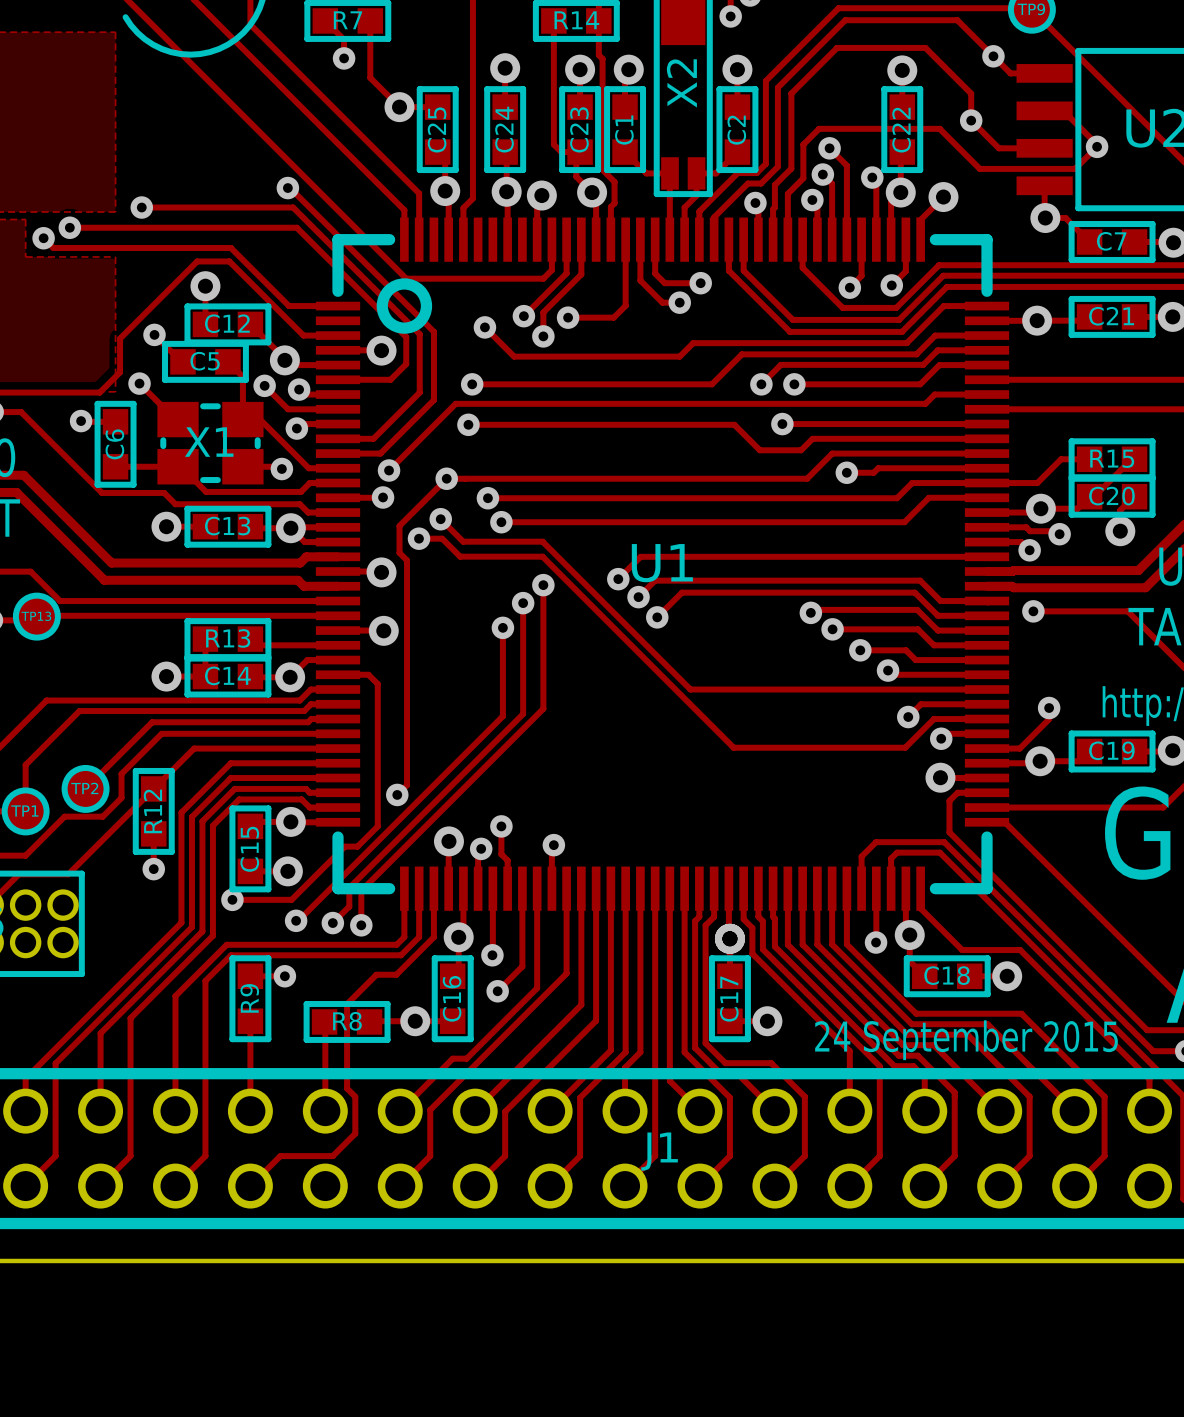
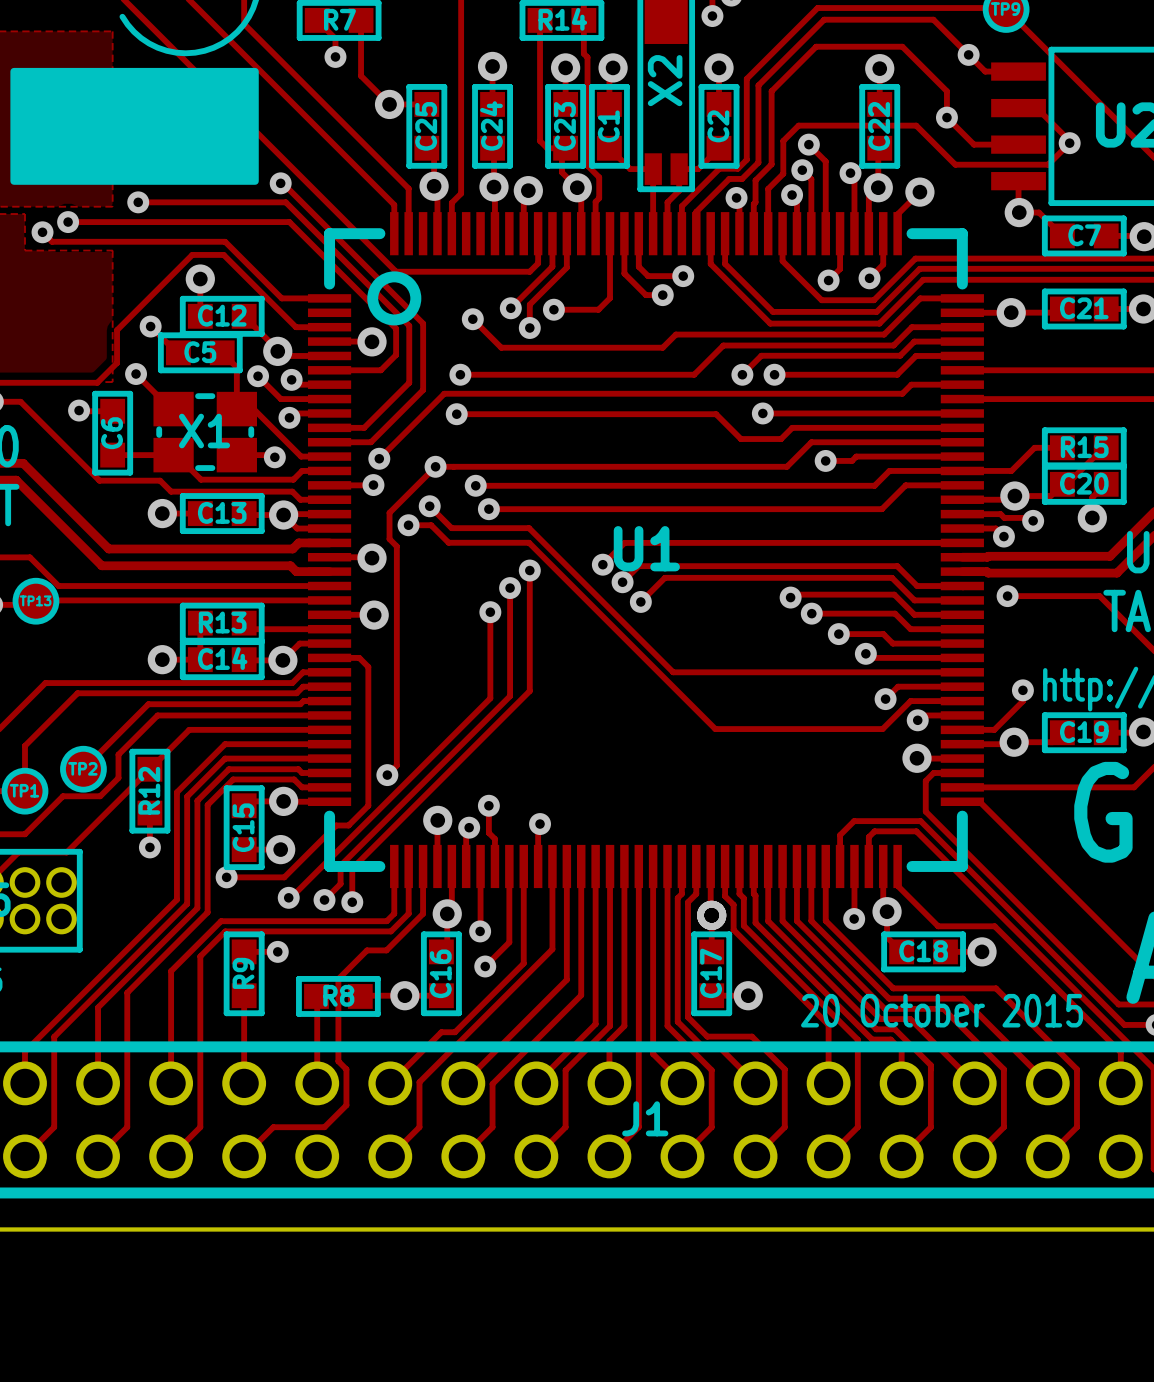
drawing: none -> [10, 67, 259, 185]
text: 24 September 2015 (966, 1040) -> 20 October 2015 (942, 1010)

